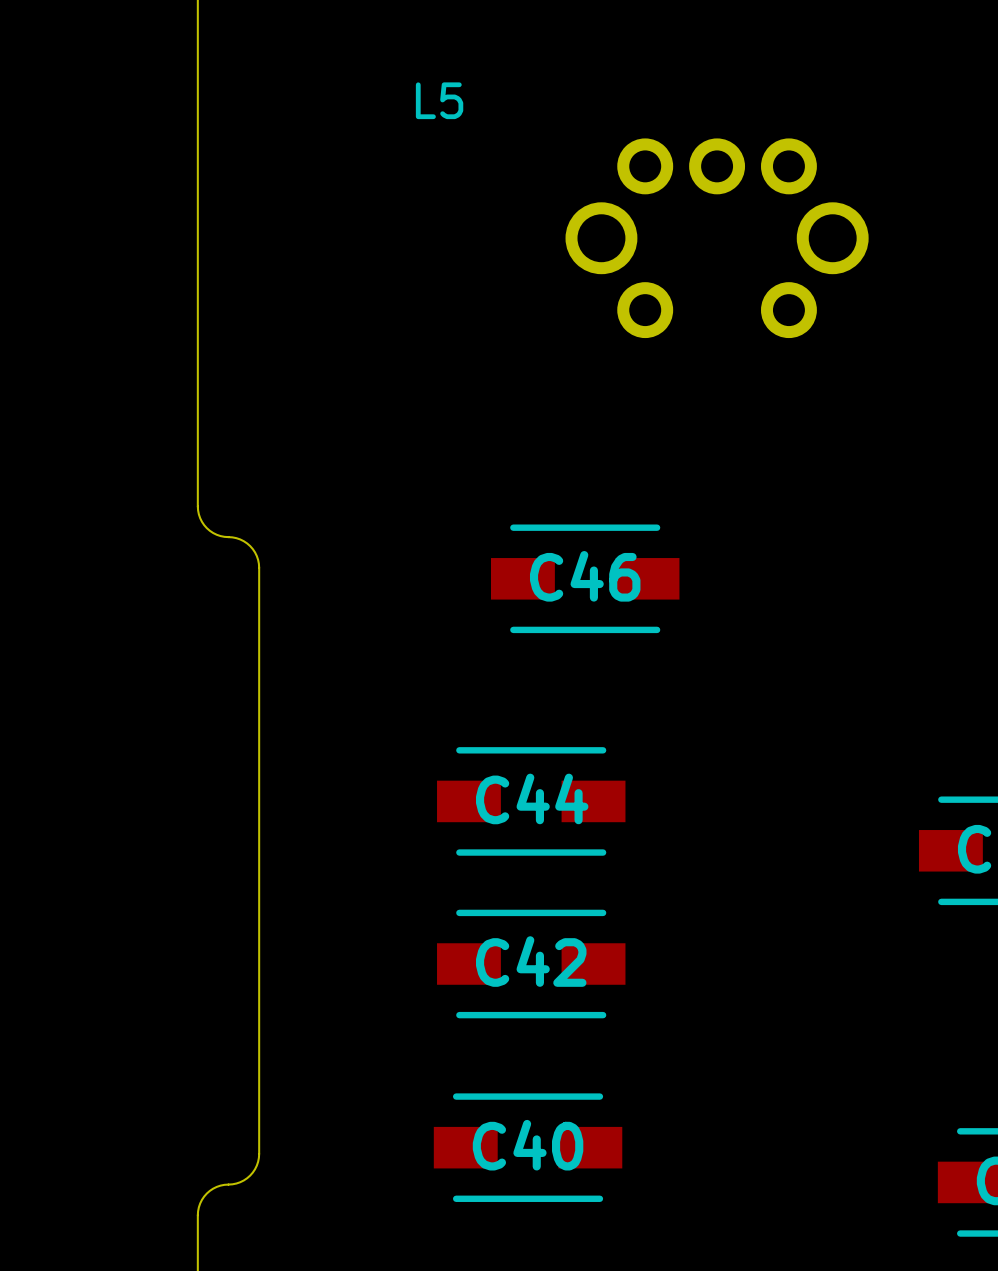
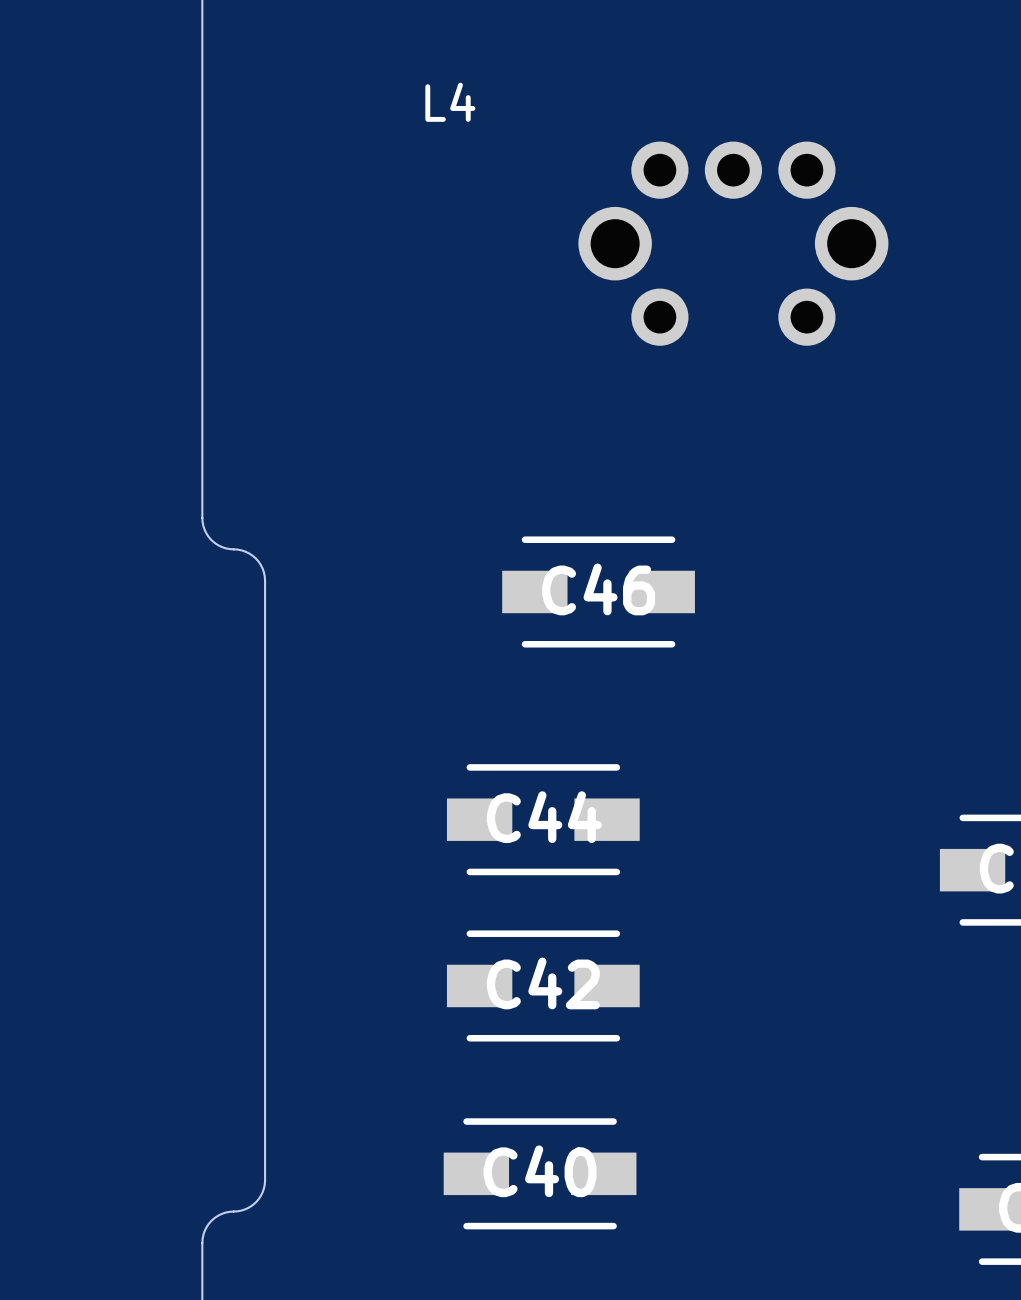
L5 name: L5 (439, 100) -> L4 (450, 102)

